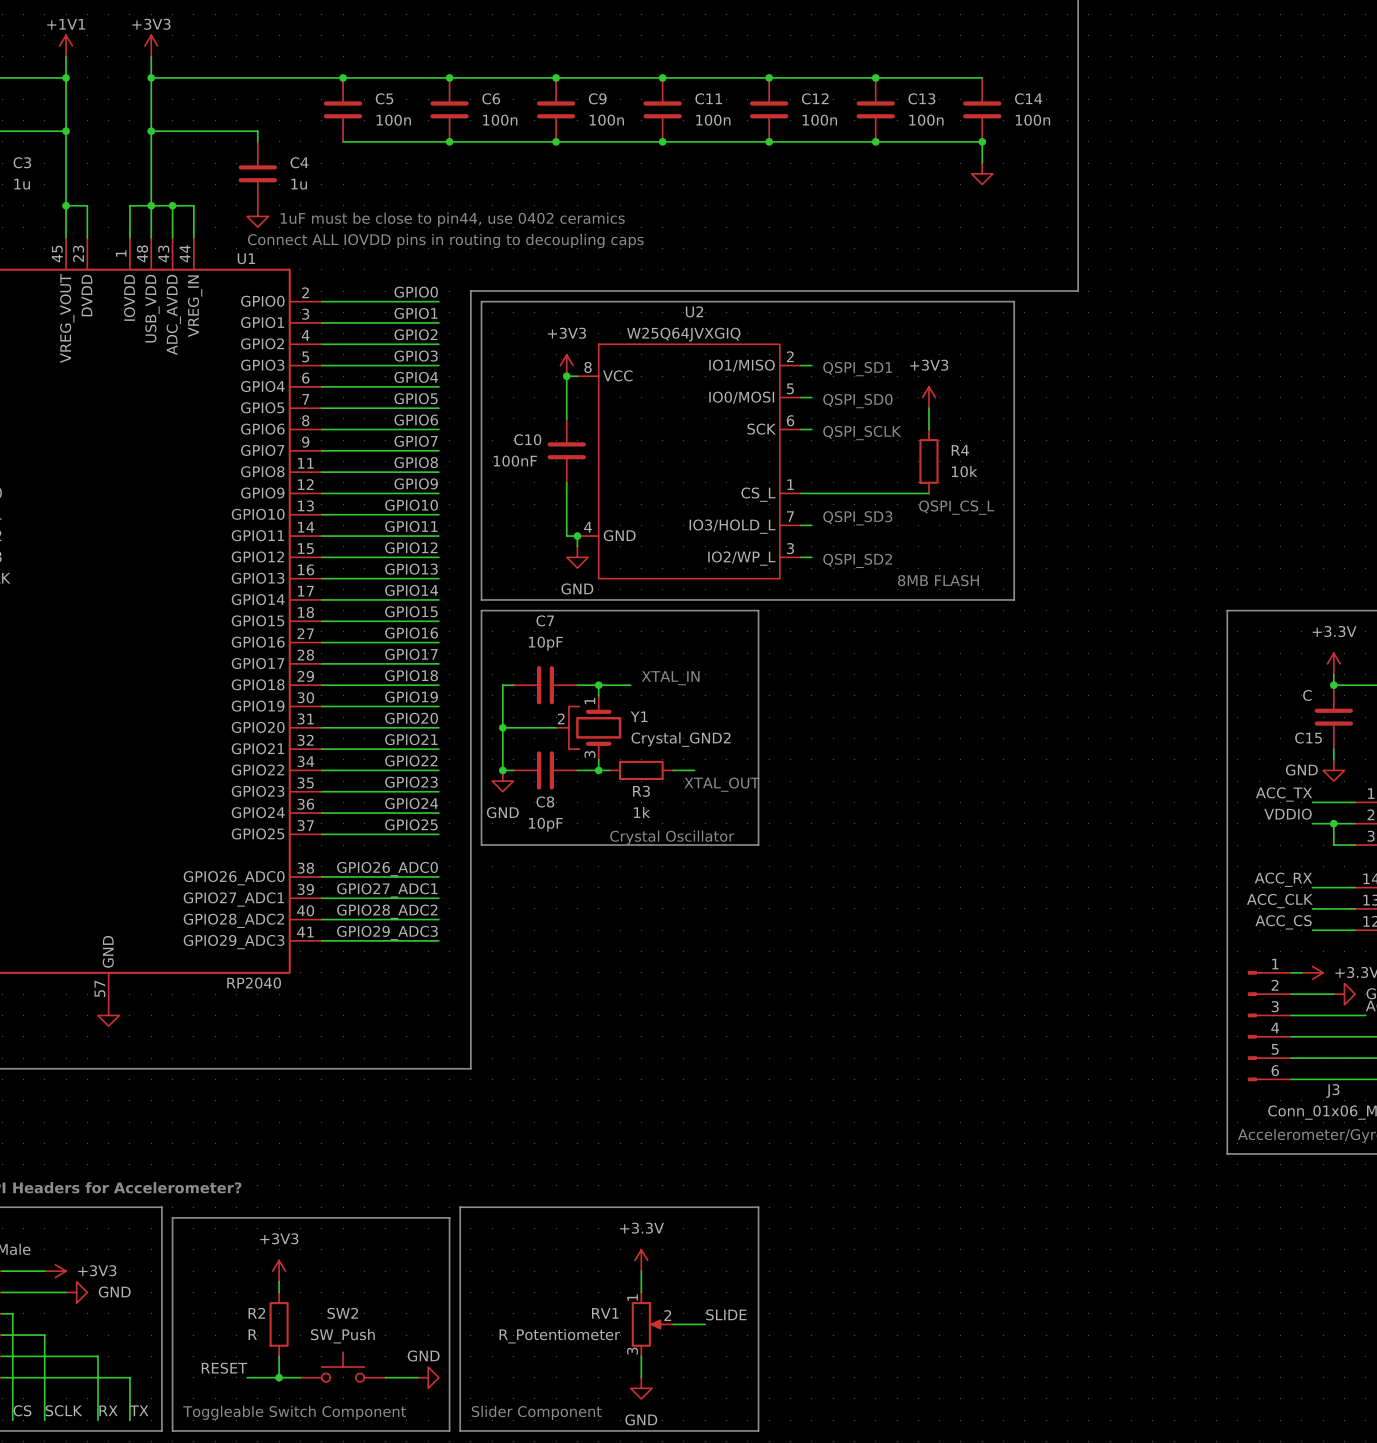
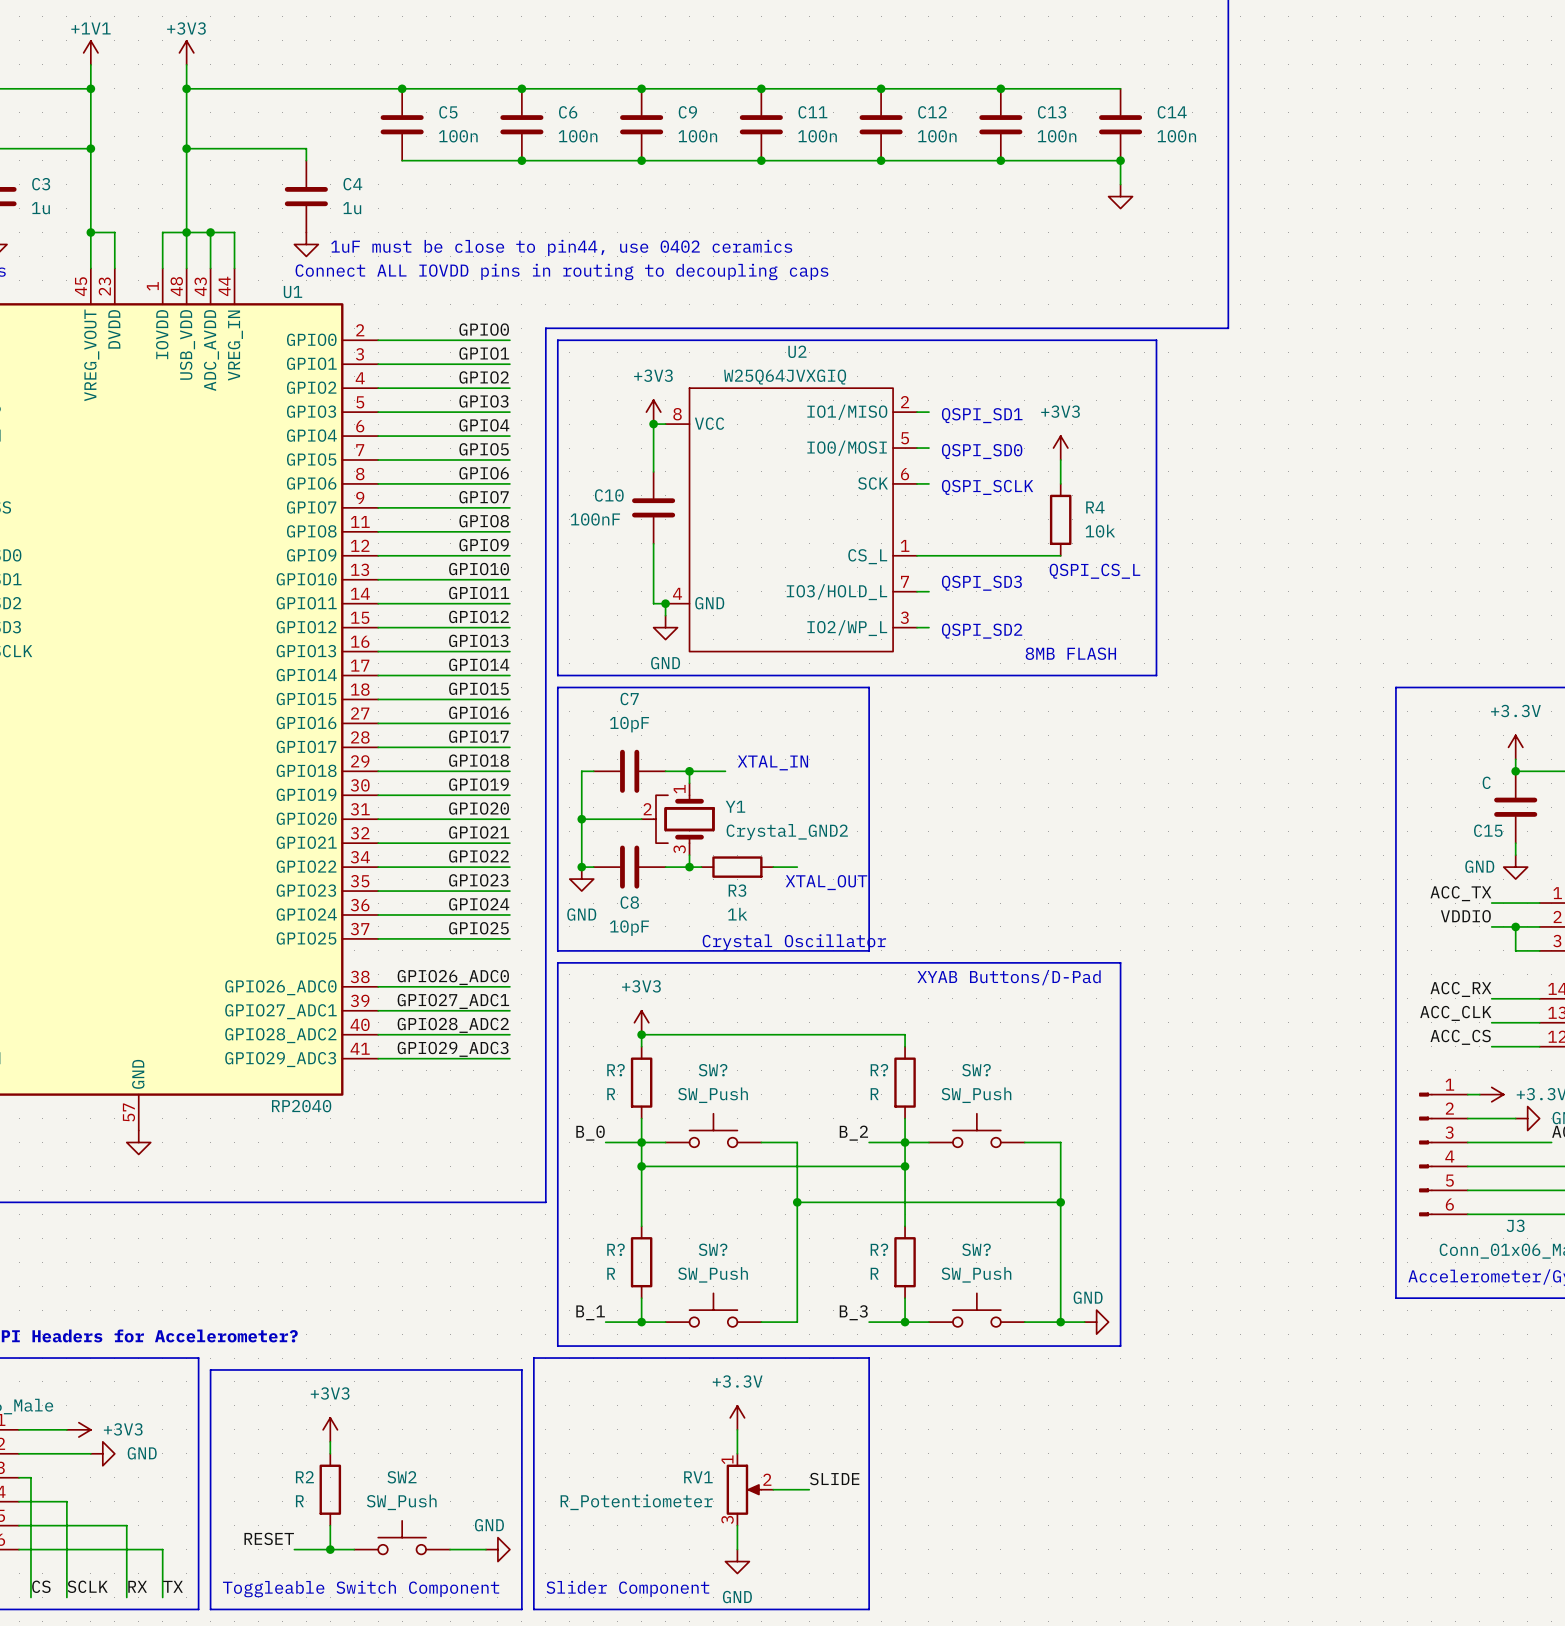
line: none -> (557, 962) (557, 1346) (1120, 1346) (1120, 962) (557, 962)
text: none -> XYAB Buttons/D-Pad (1009, 977)
power symbol: none -> +3V3 (641, 1022)
junction: none -> (641, 1034)
wire: none -> (641, 1046) (641, 1034) (905, 1034) (905, 1046)
R?: none -> R (641, 1082)
R?: none -> R (905, 1082)
wire: none -> (641, 1118) (641, 1226)
wire: none -> (905, 1118) (905, 1226)
SW?: none -> SW_Push (713, 1130)
SW?: none -> SW_Push (976, 1130)
label: none -> B_0 (590, 1133)
label: none -> B_2 (853, 1133)
wire: none -> (605, 1142) (665, 1142)
junction: none -> (641, 1142)
wire: none -> (761, 1142) (797, 1142) (797, 1322) (761, 1322)
wire: none -> (869, 1142) (928, 1142)
junction: none -> (905, 1142)
wire: none -> (1024, 1142) (1060, 1142) (1060, 1322)
wire: none -> (641, 1166) (905, 1166)
junction: none -> (641, 1166)
junction: none -> (905, 1166)
wire: none -> (797, 1202) (1060, 1202)
junction: none -> (797, 1202)
junction: none -> (1060, 1202)
R?: none -> R (641, 1262)
R?: none -> R (905, 1262)
wire: none -> (641, 1298) (641, 1322)
wire: none -> (905, 1298) (905, 1322)
SW?: none -> SW_Push (713, 1310)
SW?: none -> SW_Push (976, 1310)
label: none -> B_1 (590, 1312)
label: none -> B_3 (853, 1312)
wire: none -> (605, 1322) (665, 1322)
junction: none -> (641, 1322)
wire: none -> (869, 1322) (928, 1322)
junction: none -> (905, 1322)
wire: none -> (1024, 1322) (1084, 1322)
junction: none -> (1060, 1322)
power symbol: none -> GND (1096, 1322)

